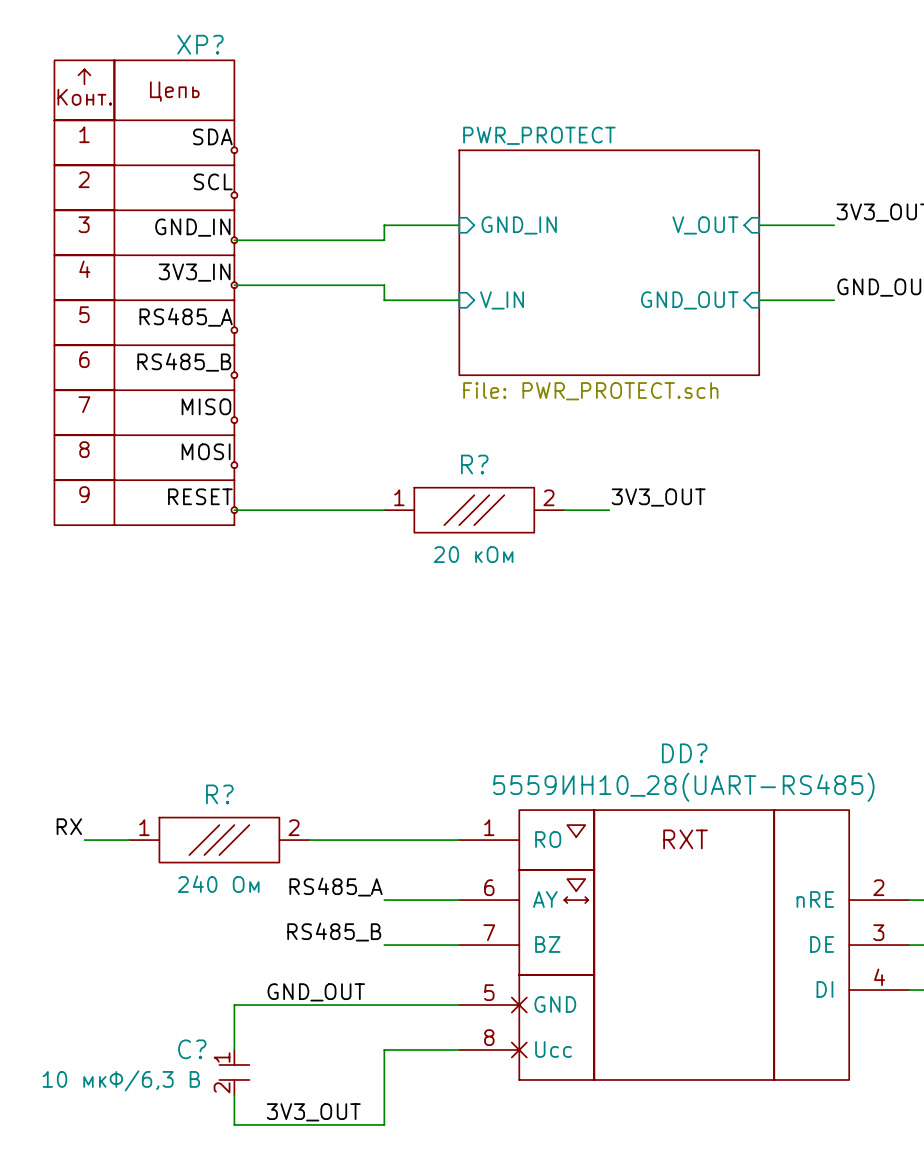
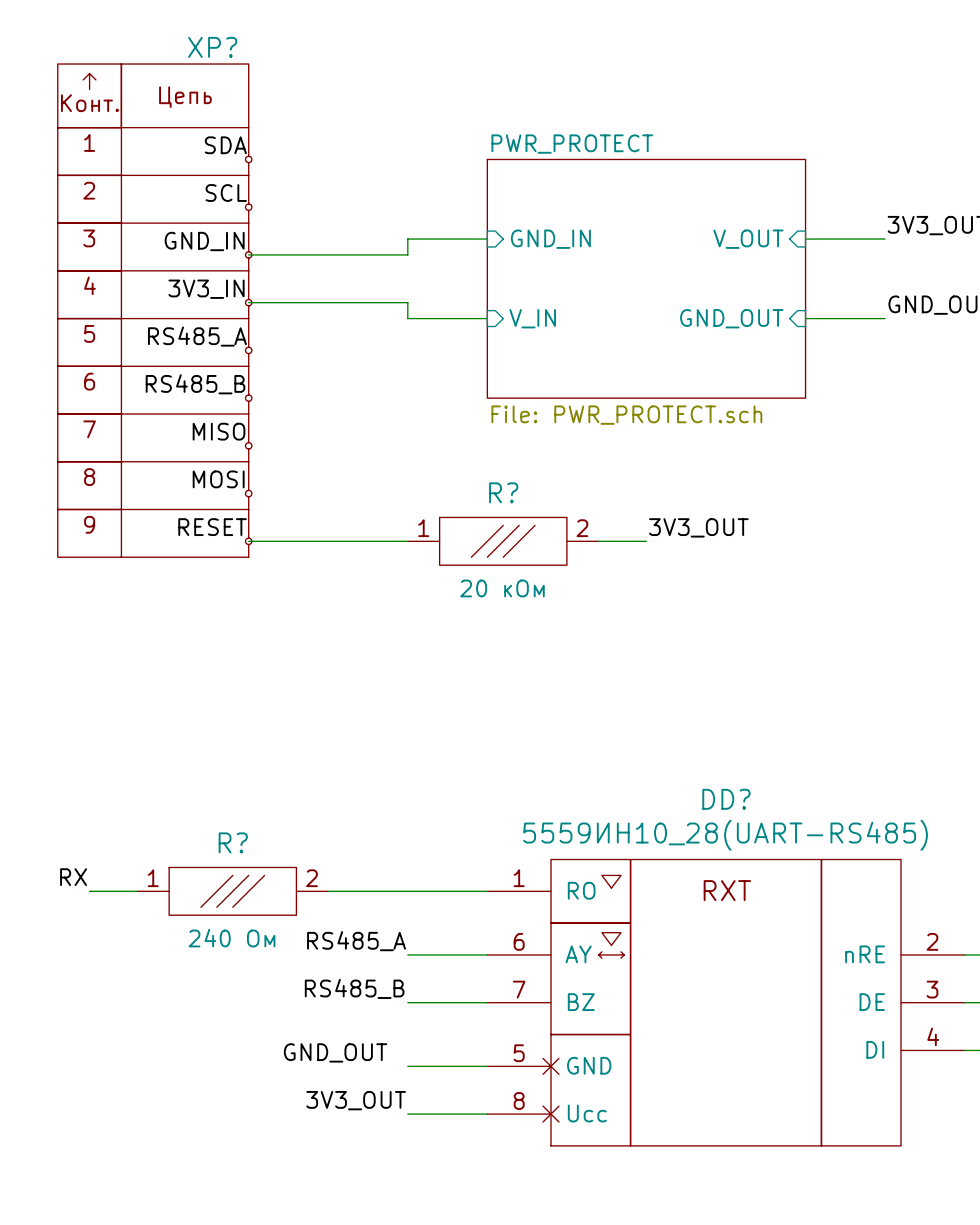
wire: (384, 1005) (234, 1005) (234, 1050) -> none
wire: (384, 1050) (384, 1124) (234, 1124) (234, 1094) -> none
C?: (234, 1072) -> none
label position: 3V3_OUT (313, 1112) -> 3V3_OUT (356, 1100)

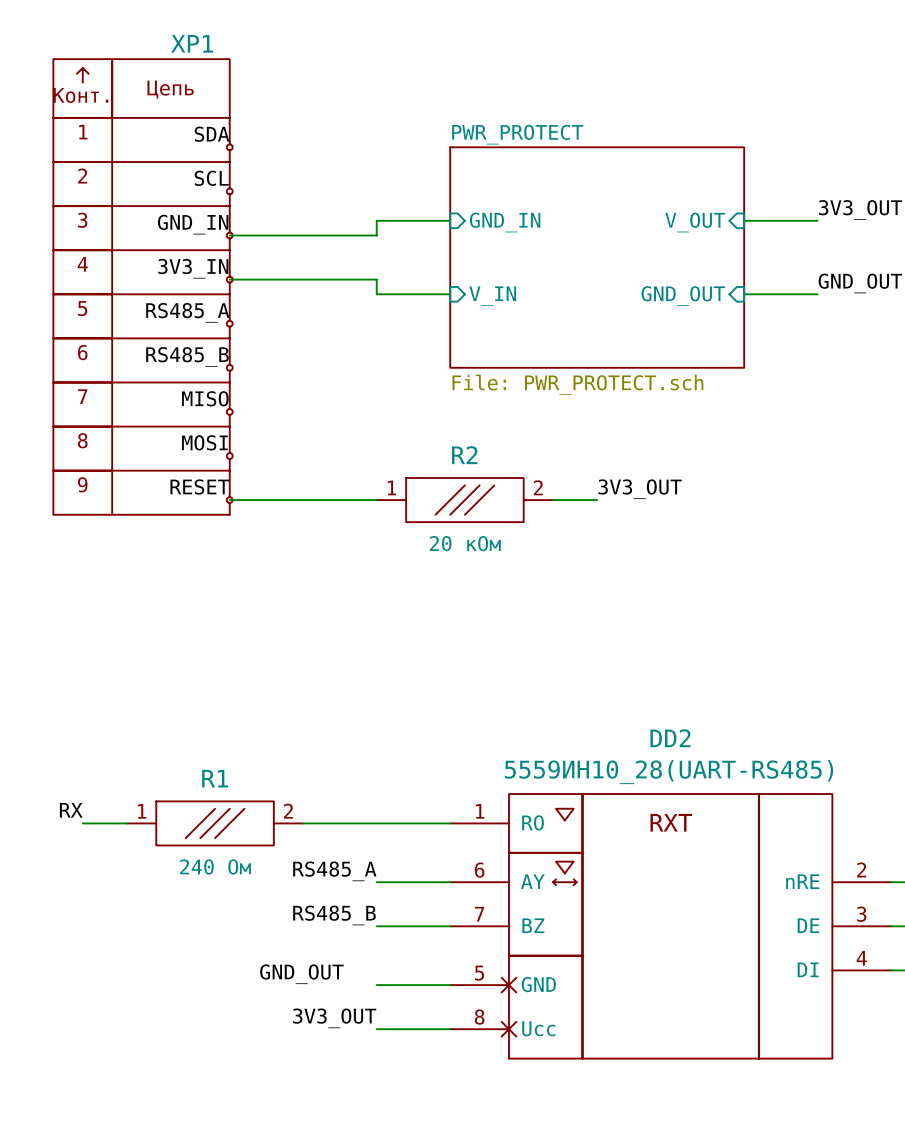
XP? name: XP? (212, 47) -> XP1 (192, 43)
R? name: R? (503, 492) -> R2 (464, 455)
DD? name: DD? (726, 799) -> DD2 (670, 738)
R? name: R? (233, 842) -> R1 (215, 778)

